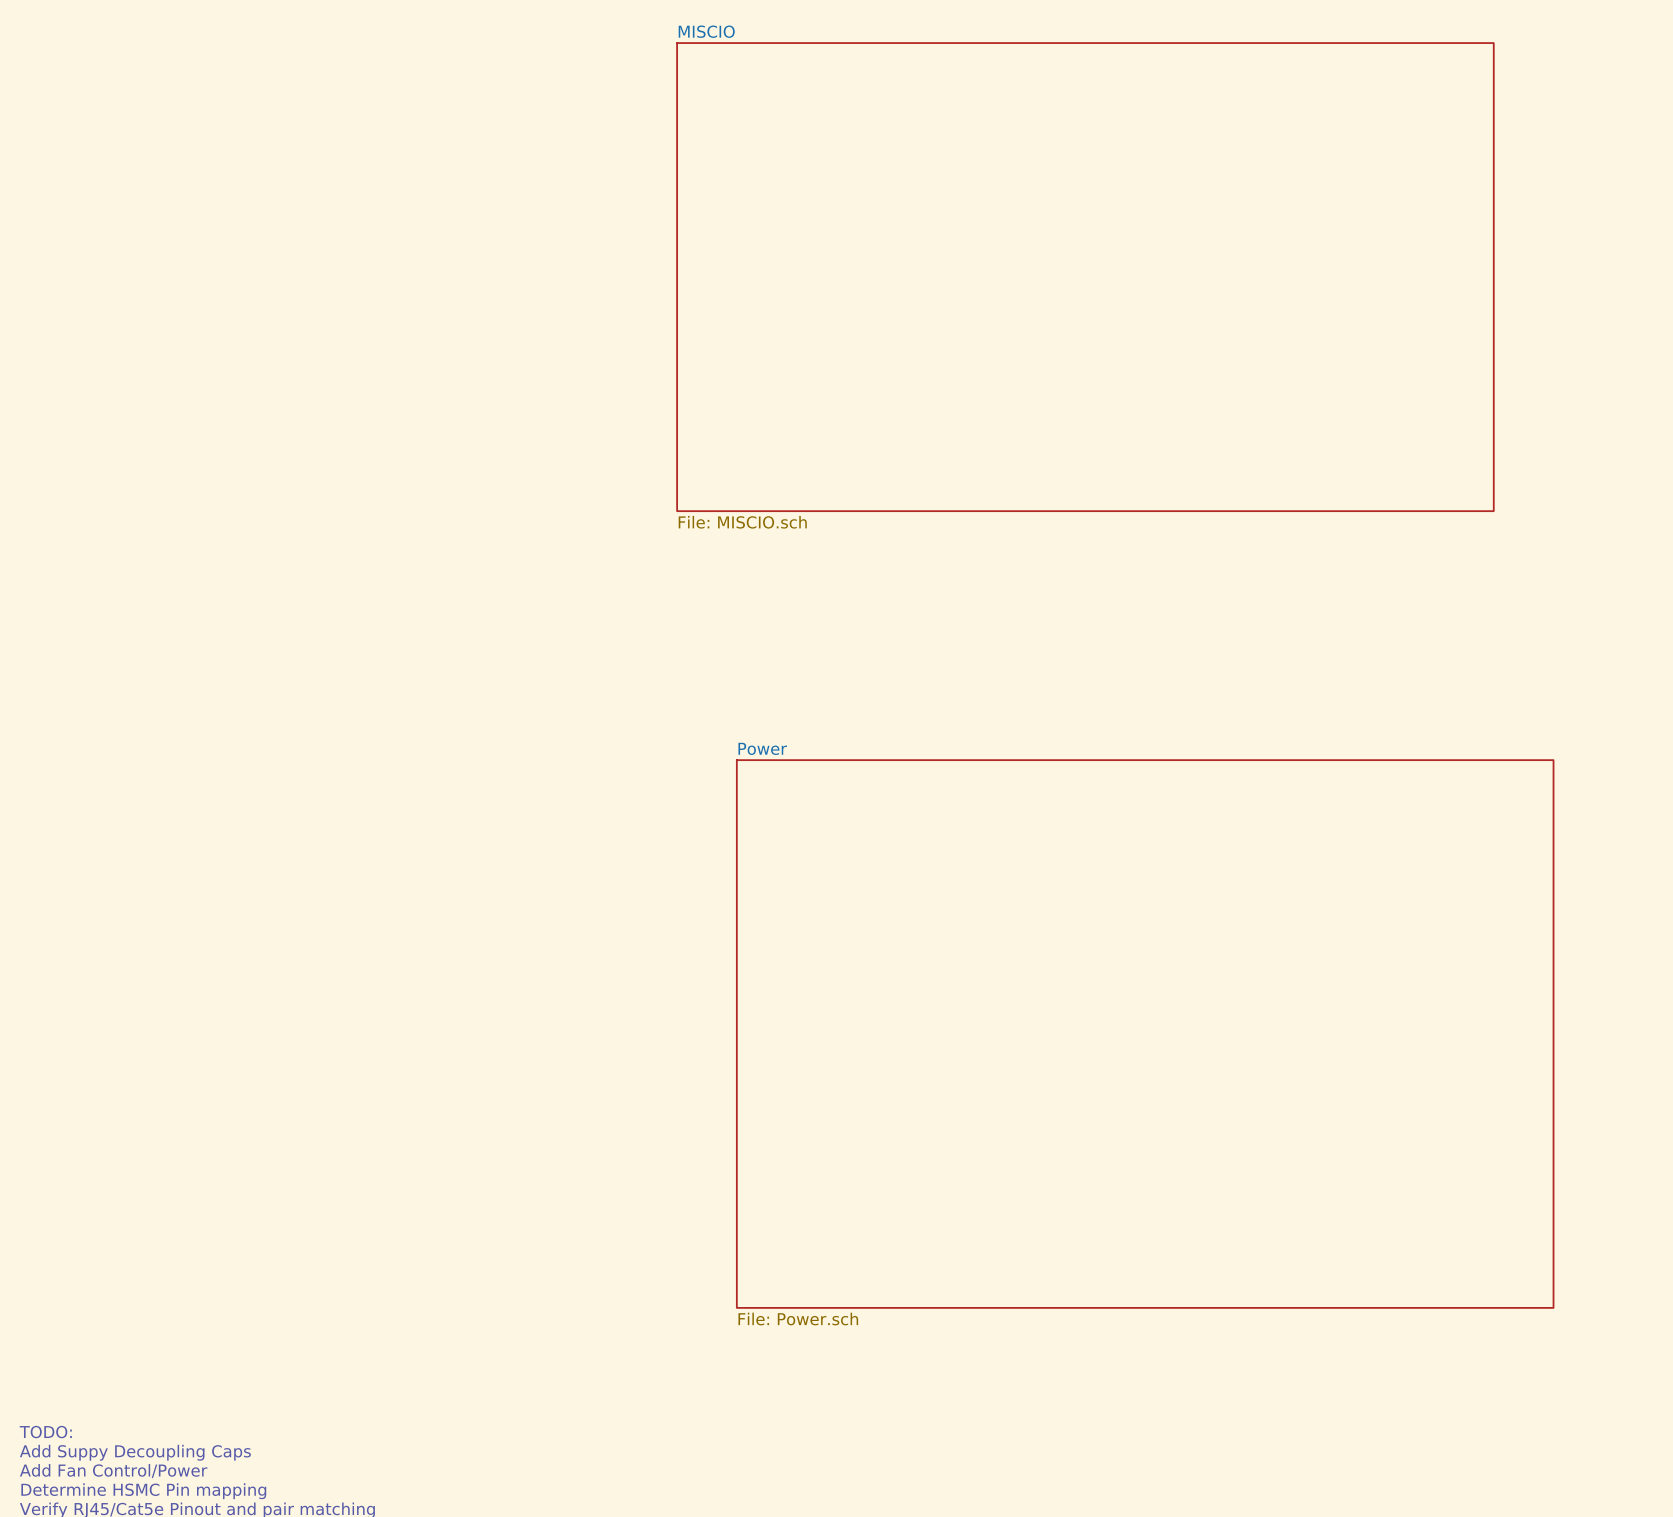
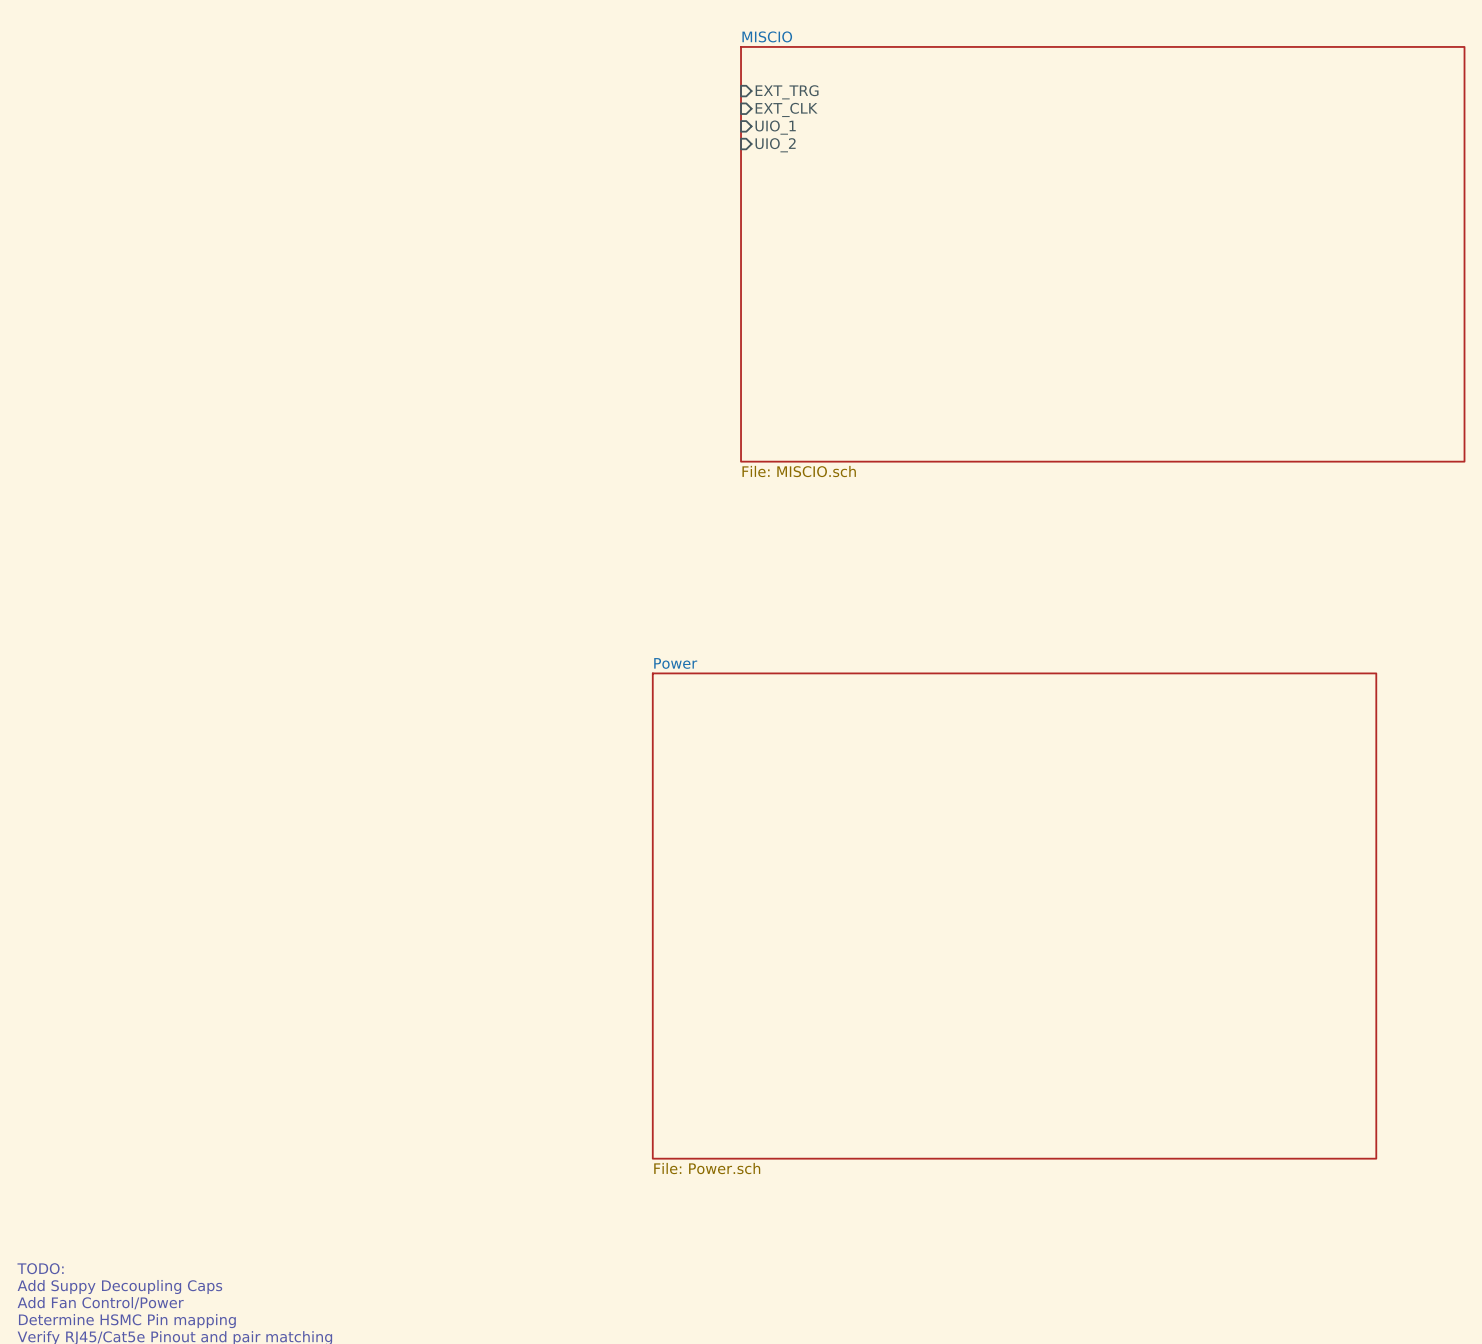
sheet pin: none -> EXT_TRG (787, 92)
sheet pin: none -> EXT_CLK (786, 109)
sheet pin: none -> UIO_1 (775, 127)
sheet pin: none -> UIO_2 (775, 145)
sheet MISCIO position: (1085, 277) -> (1102, 254)

